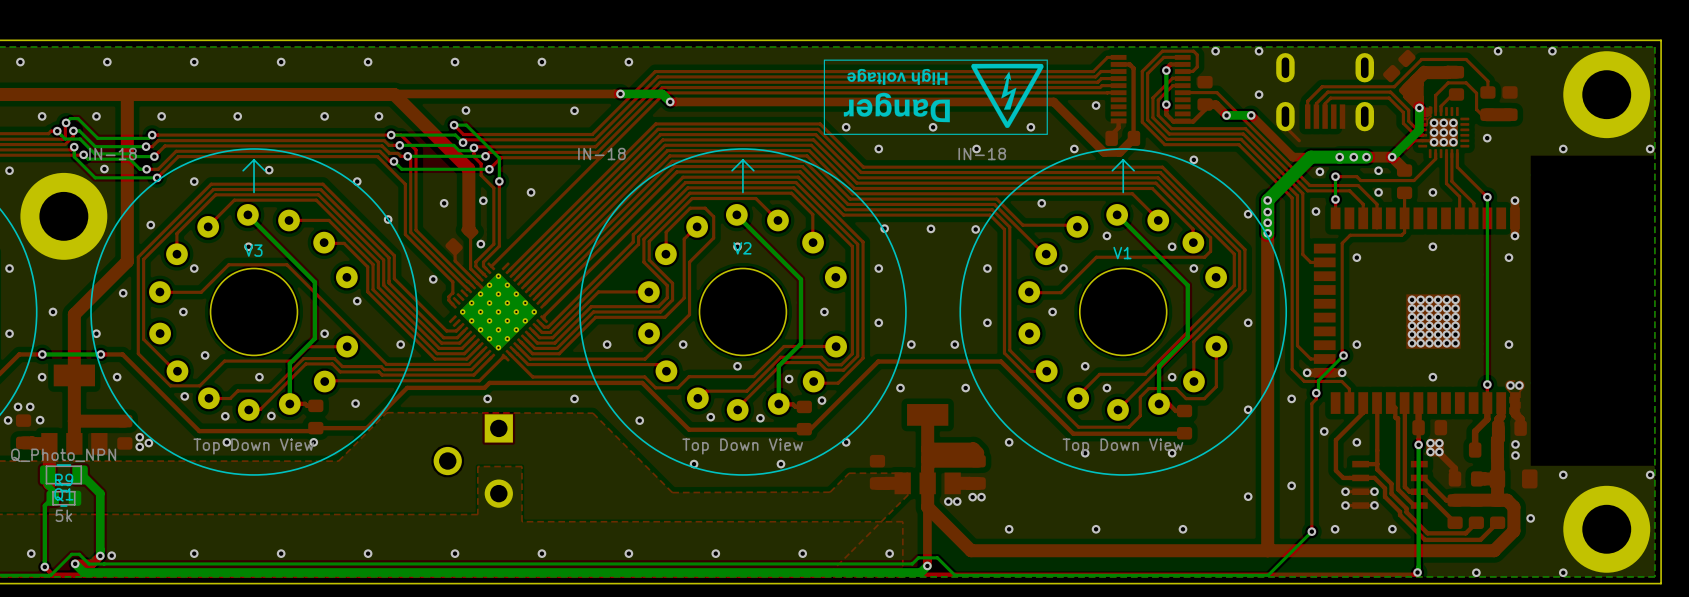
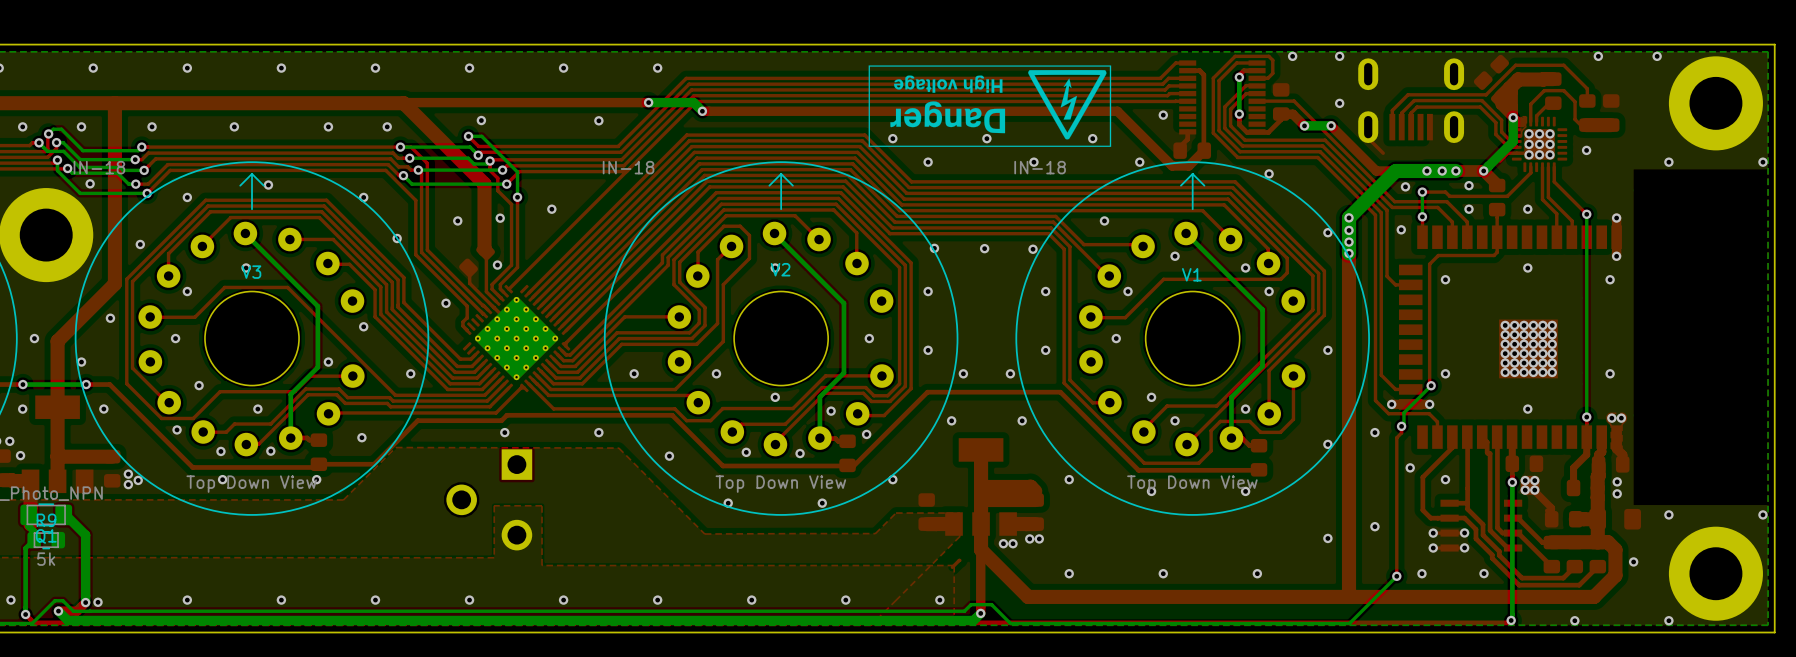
top track: none -> (959, 560) (952, 567)

